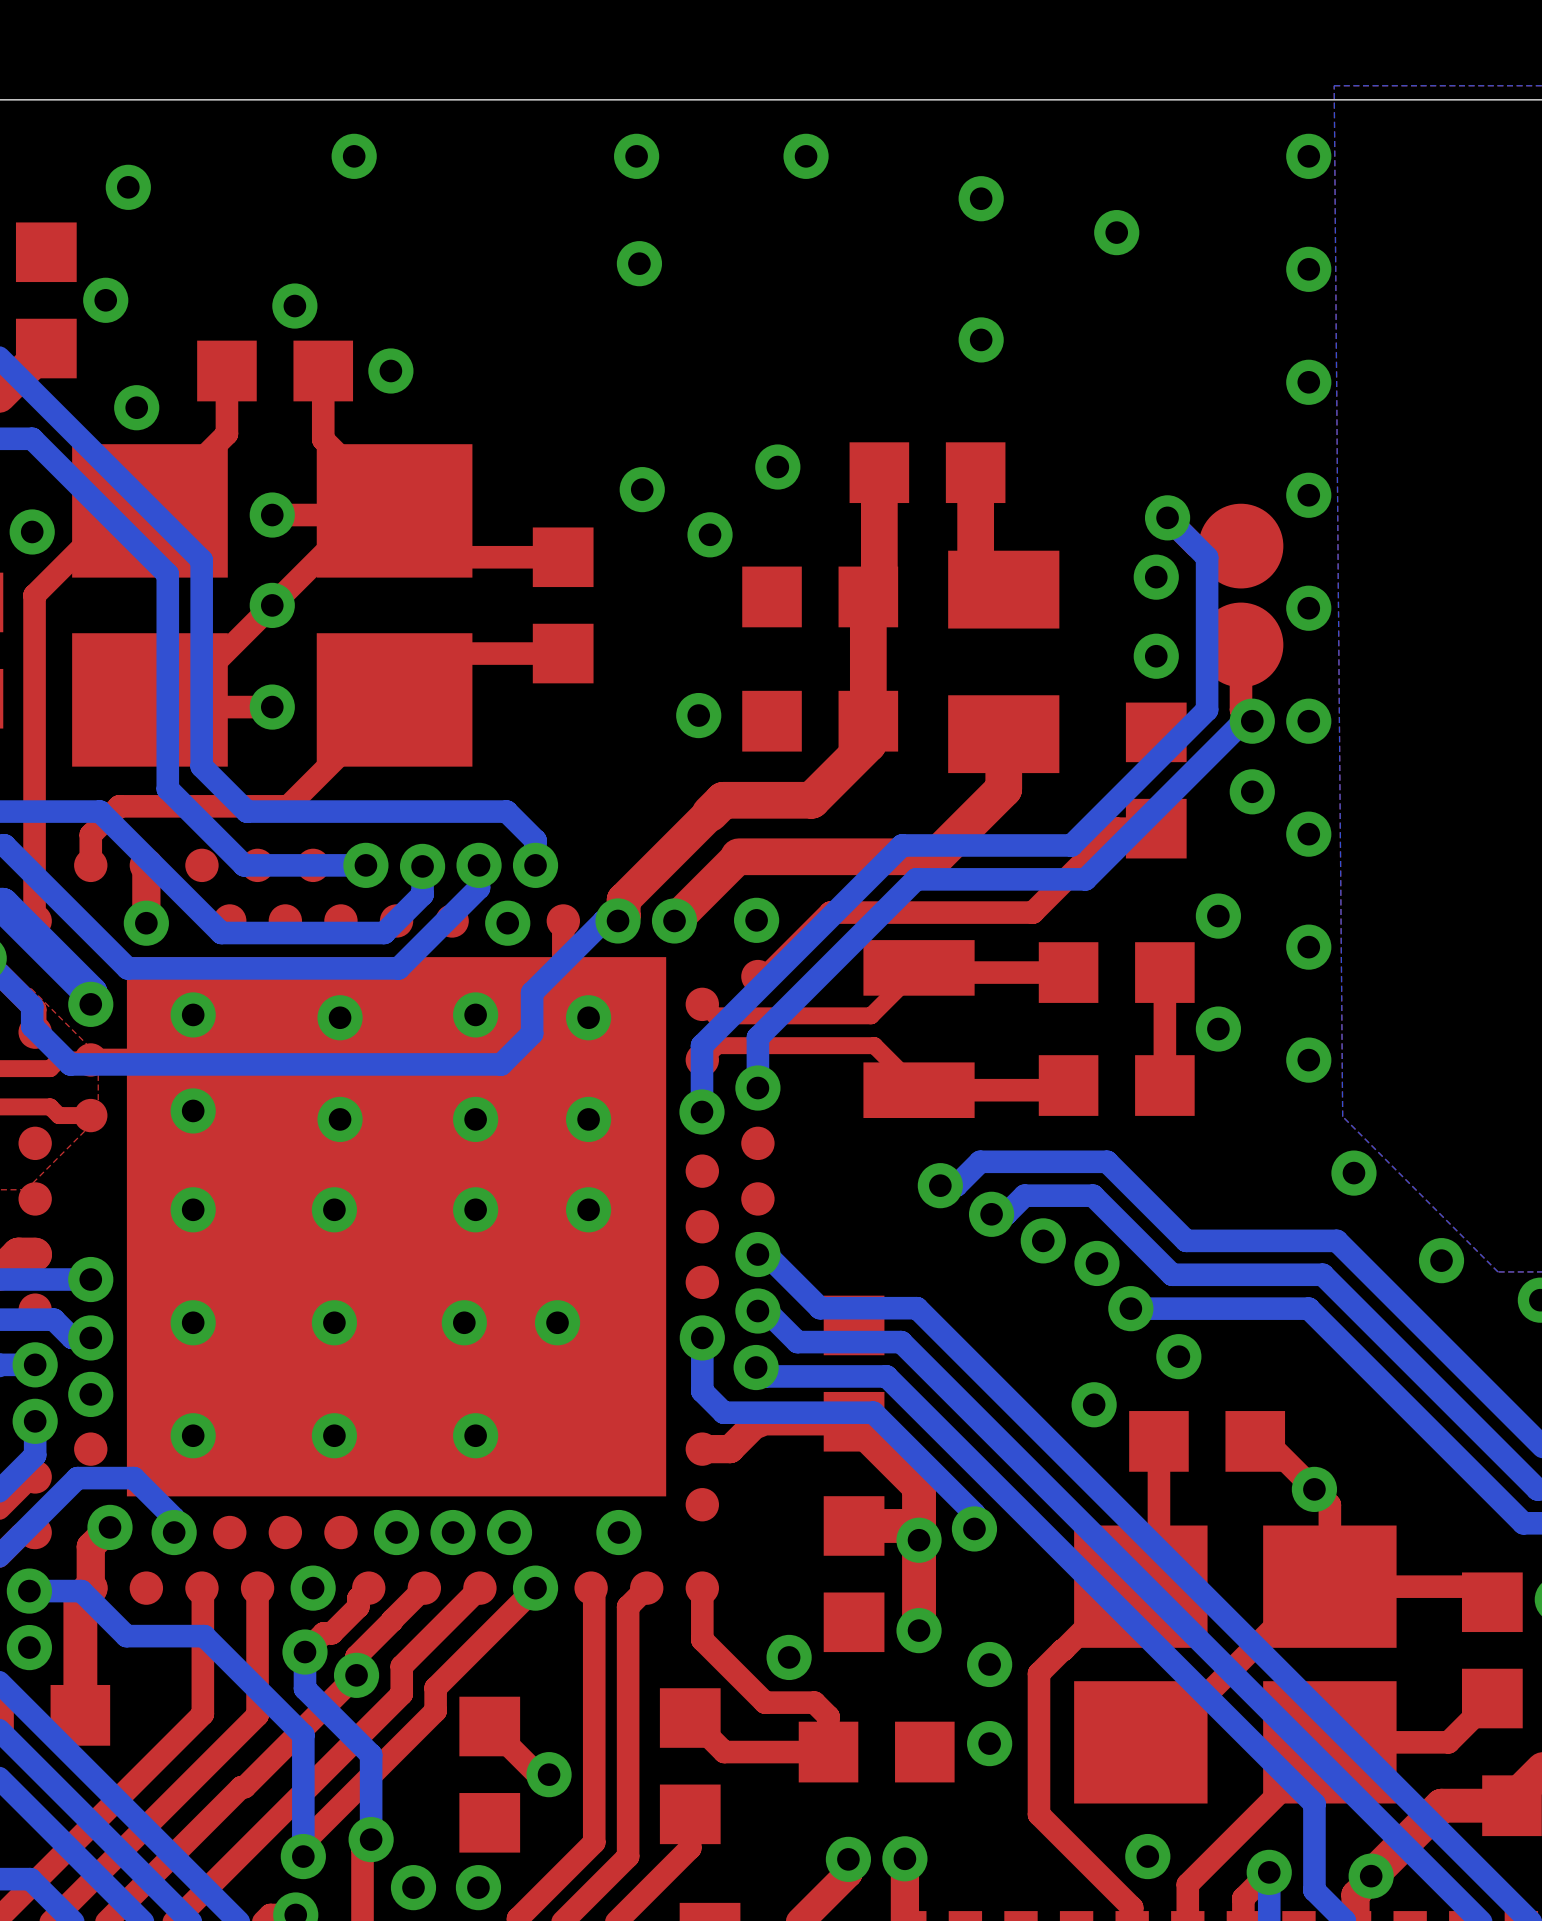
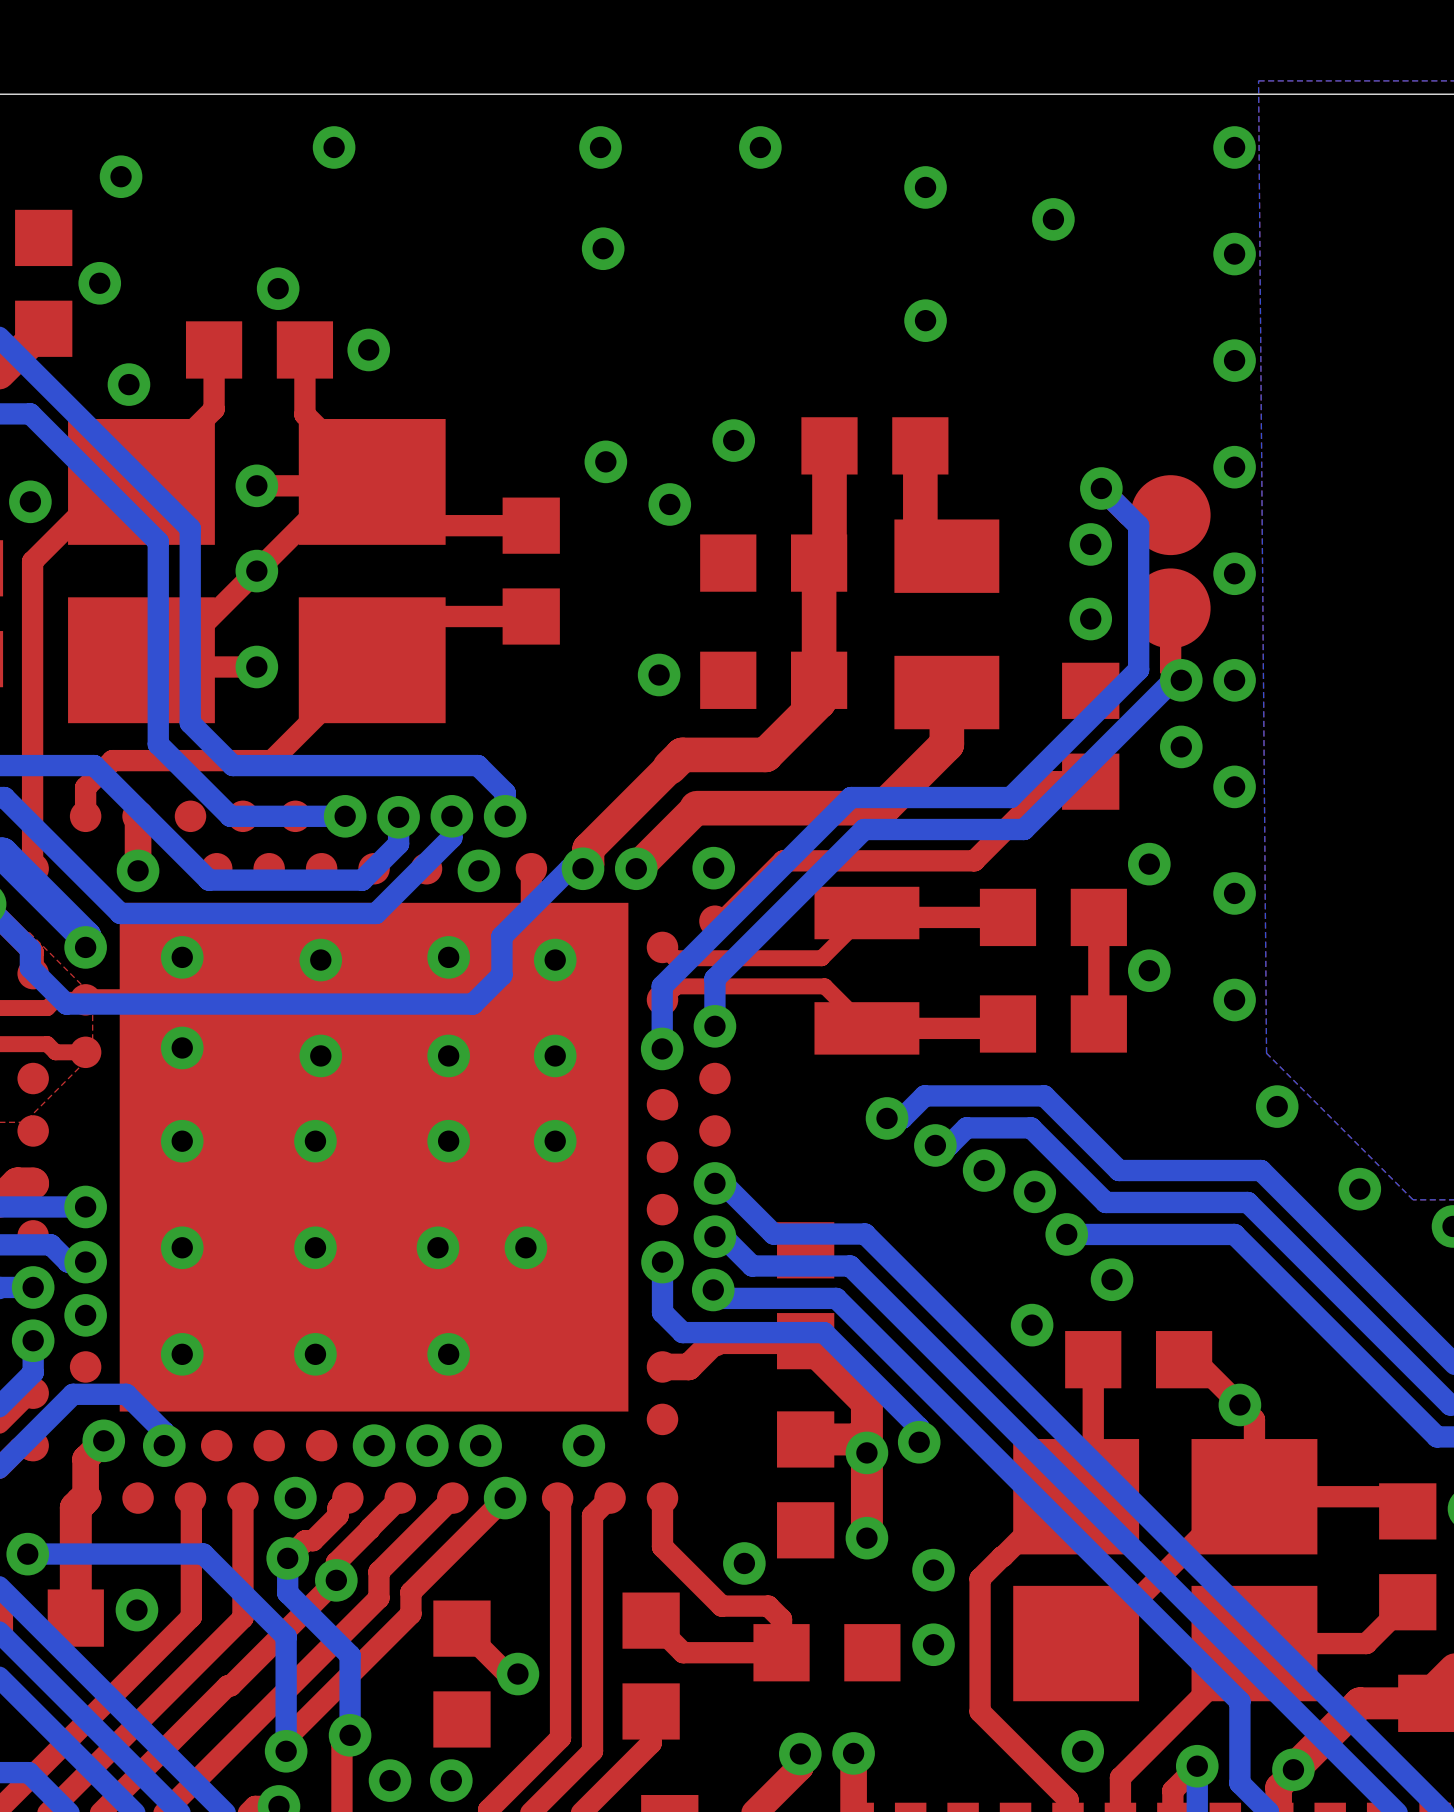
bottom track: (29, 1591) (81, 1591) (126, 1636) (204, 1636) (215, 1647) -> (27, 1554) (203, 1554)
via position: (29, 1591) -> (136, 1610)

